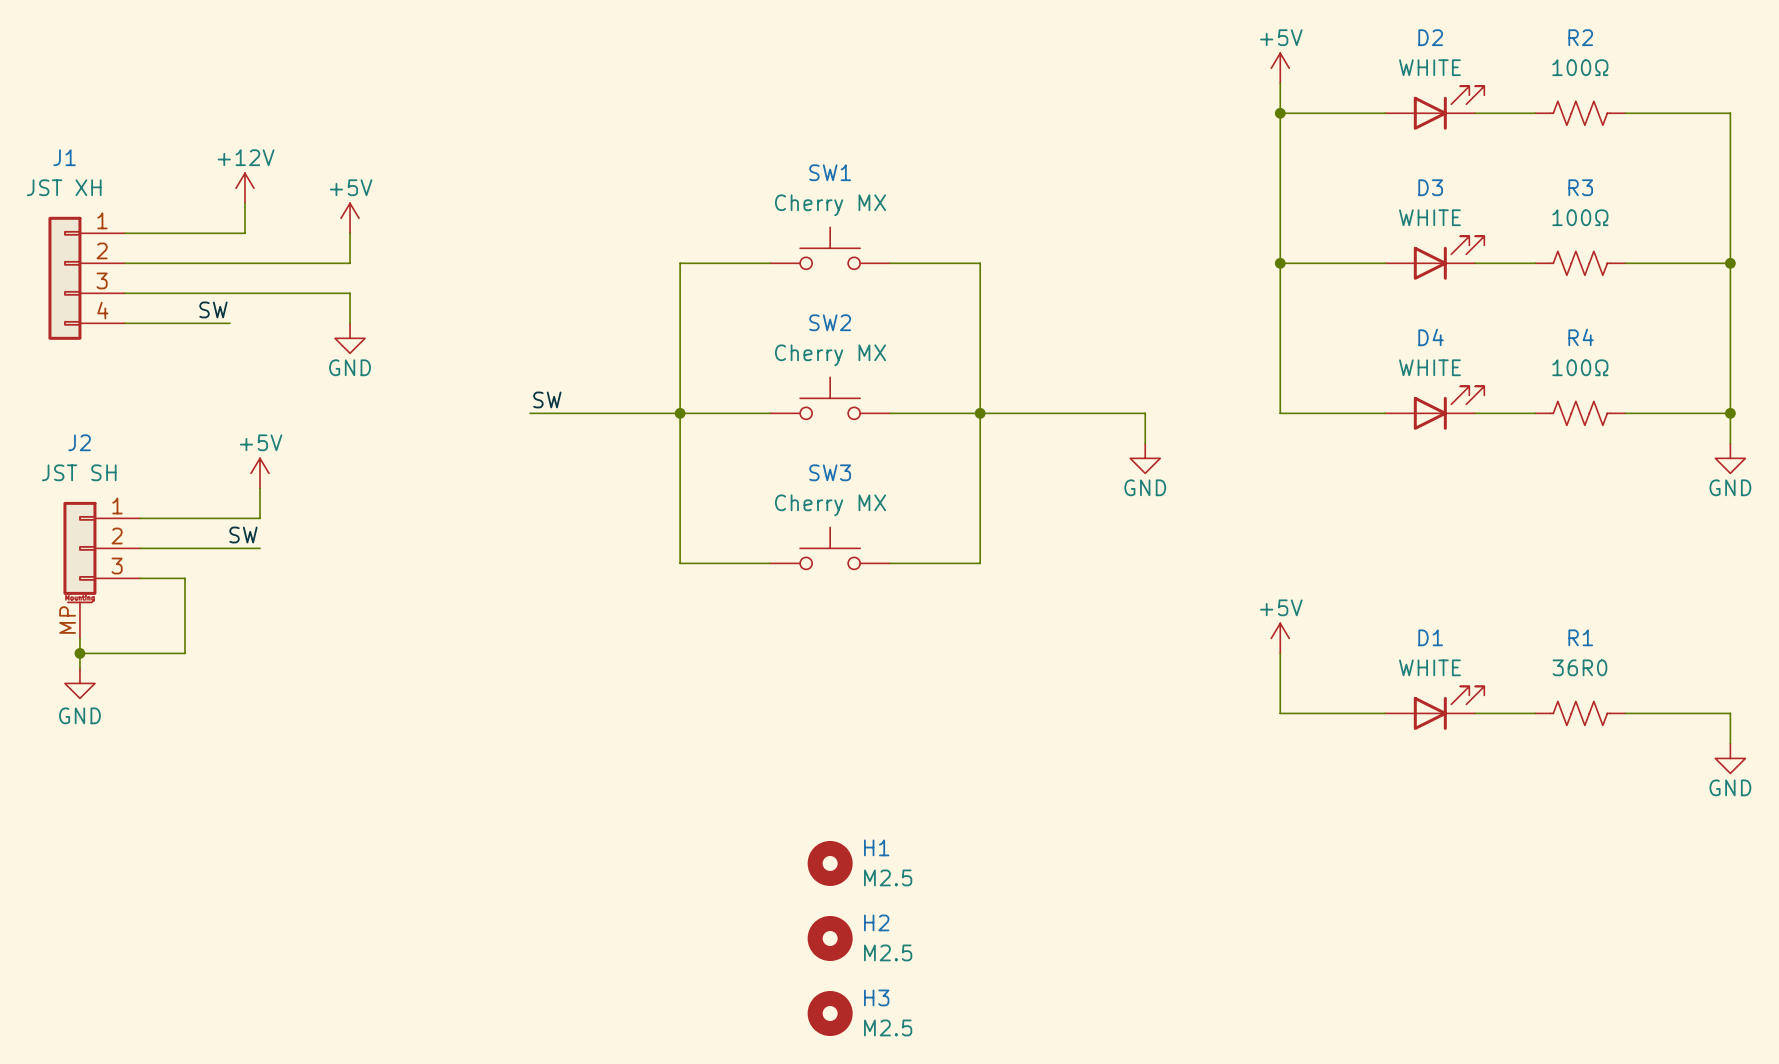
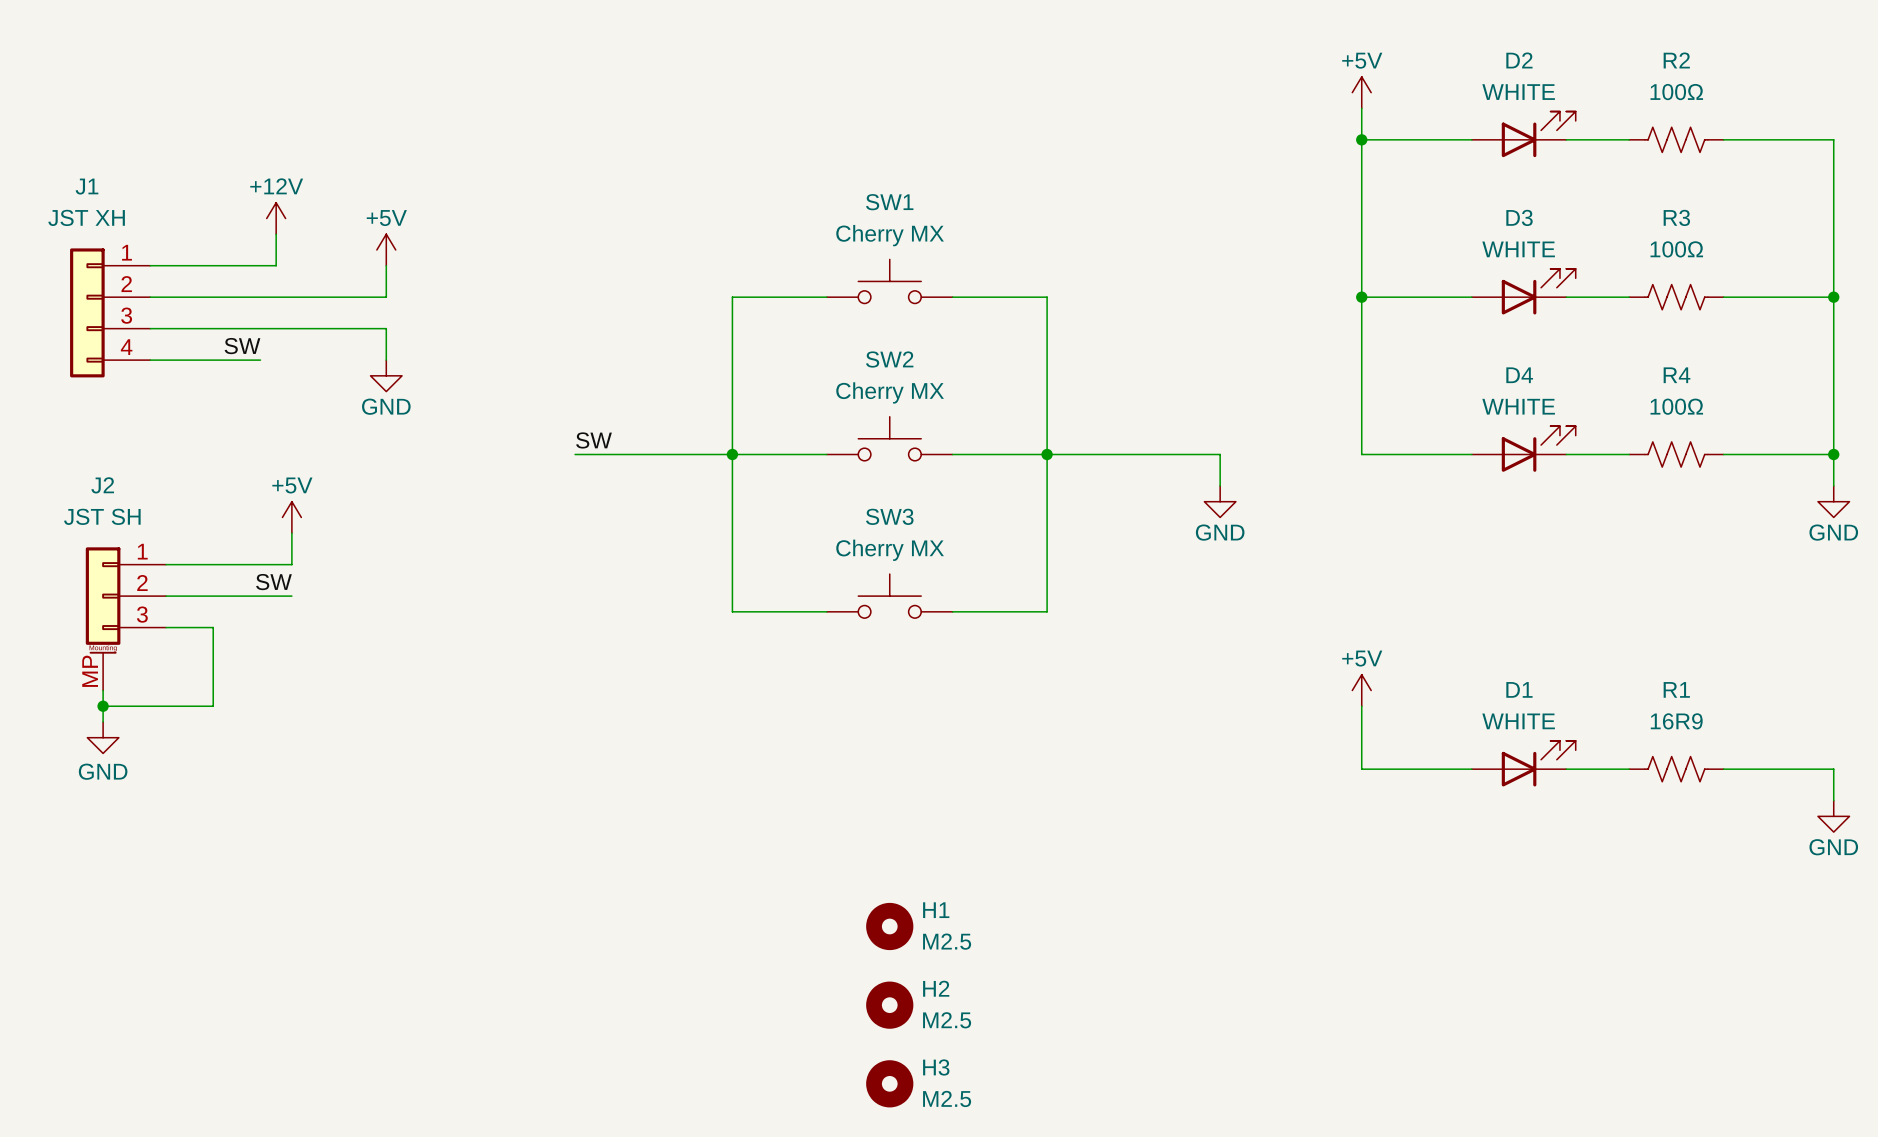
R1 value: 36R0 (1579, 667) -> 16R9 (1676, 721)

